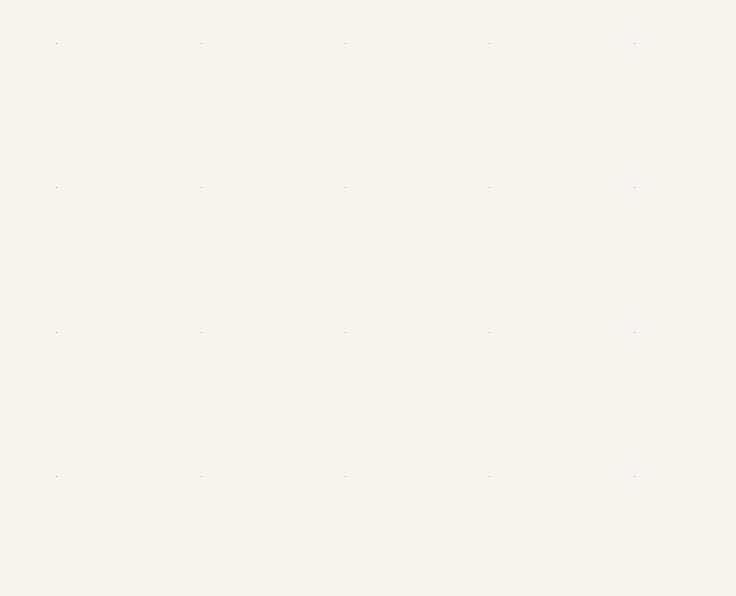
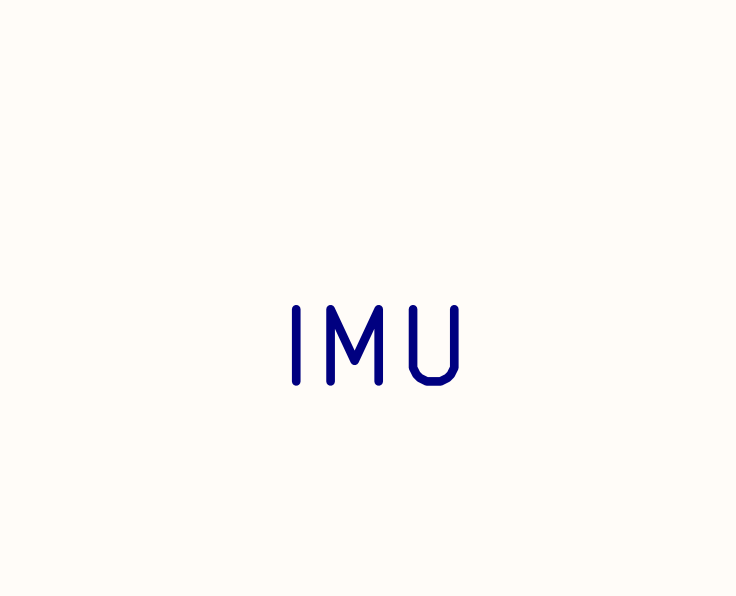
text: none -> IMU (375, 345)

